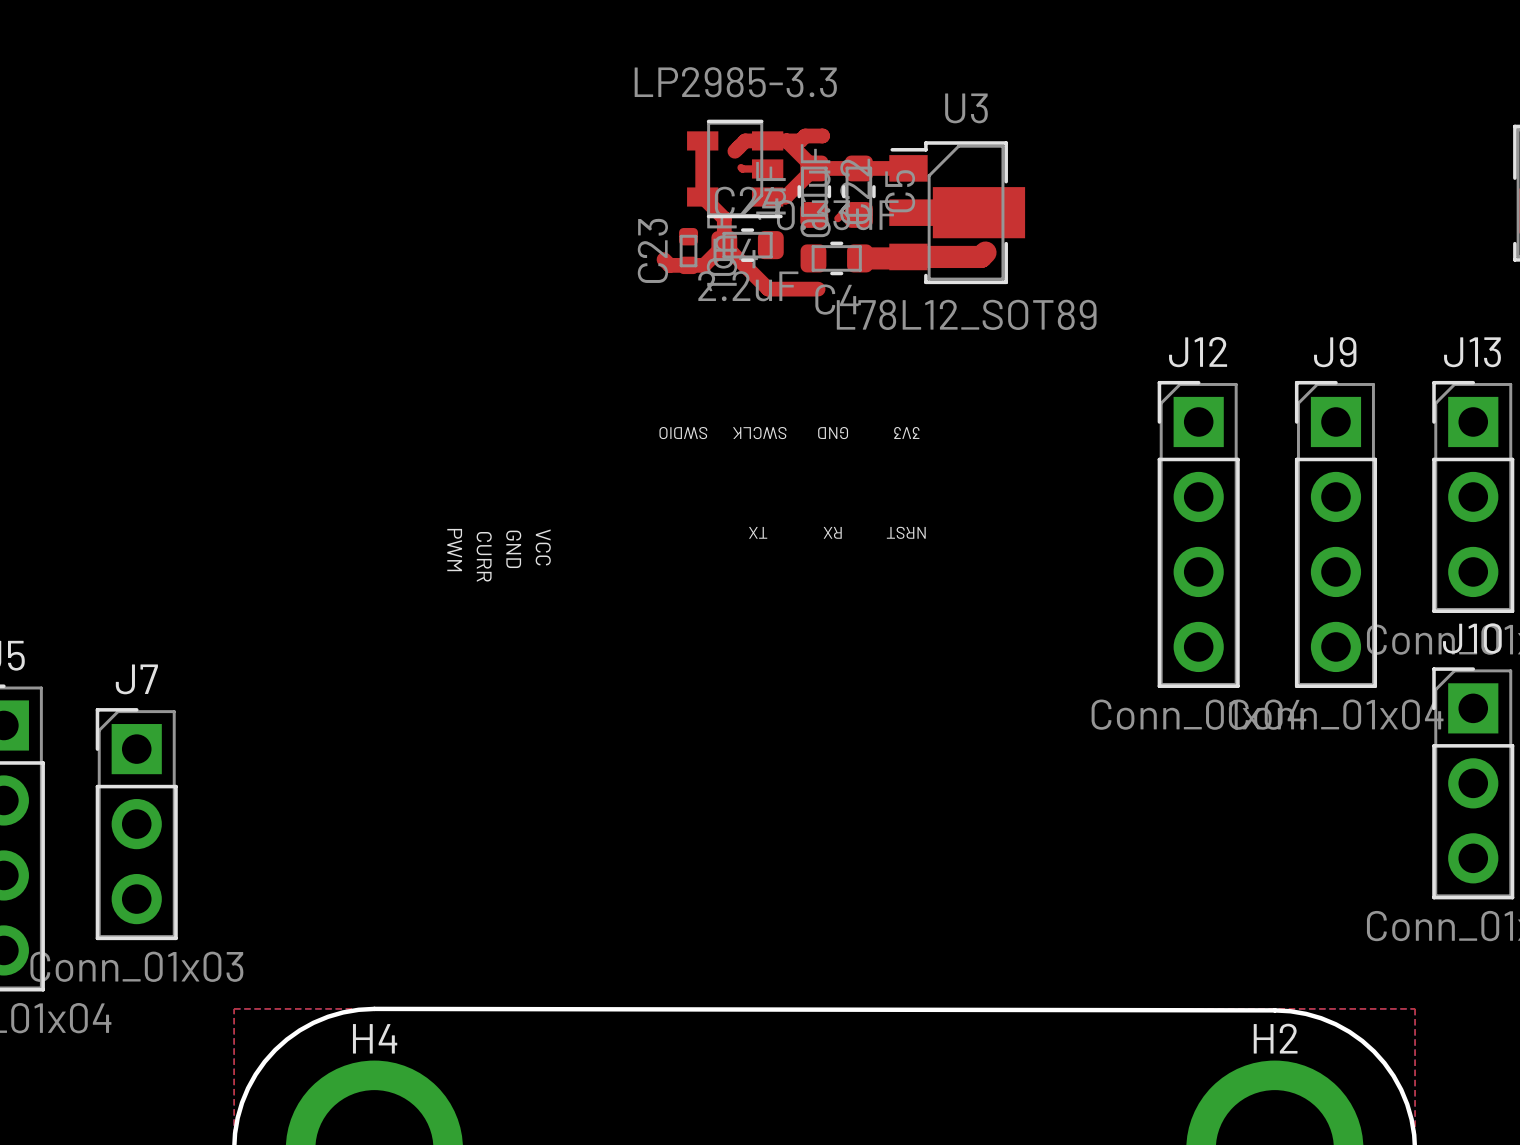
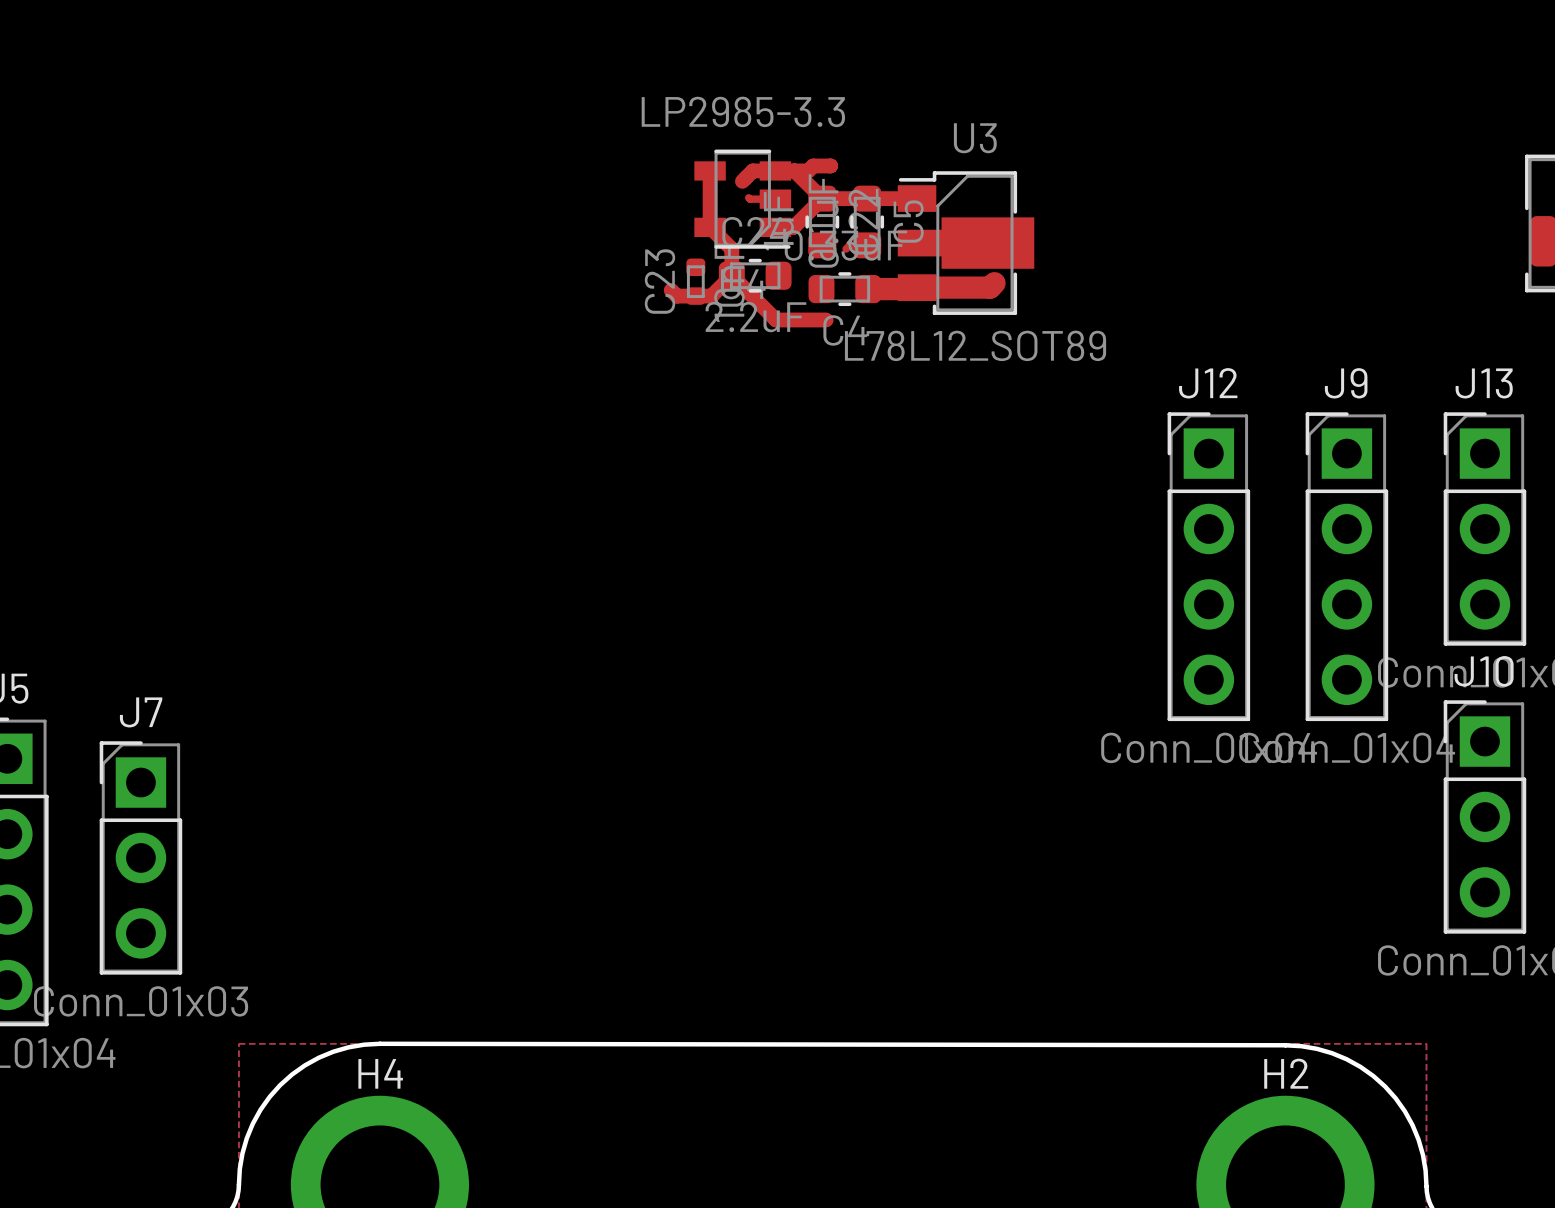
text: 3V3 (906, 432) -> none
text: SWDIO (683, 433) -> none
text: SWCLK (759, 433) -> none
text: GND (833, 433) -> none
text: TX (758, 532) -> none
text: RX (832, 532) -> none
text: NRST (906, 532) -> none
text: VCC (543, 547) -> none
text: GND (513, 549) -> none
text: PWM (454, 550) -> none
text: CURR (484, 556) -> none

